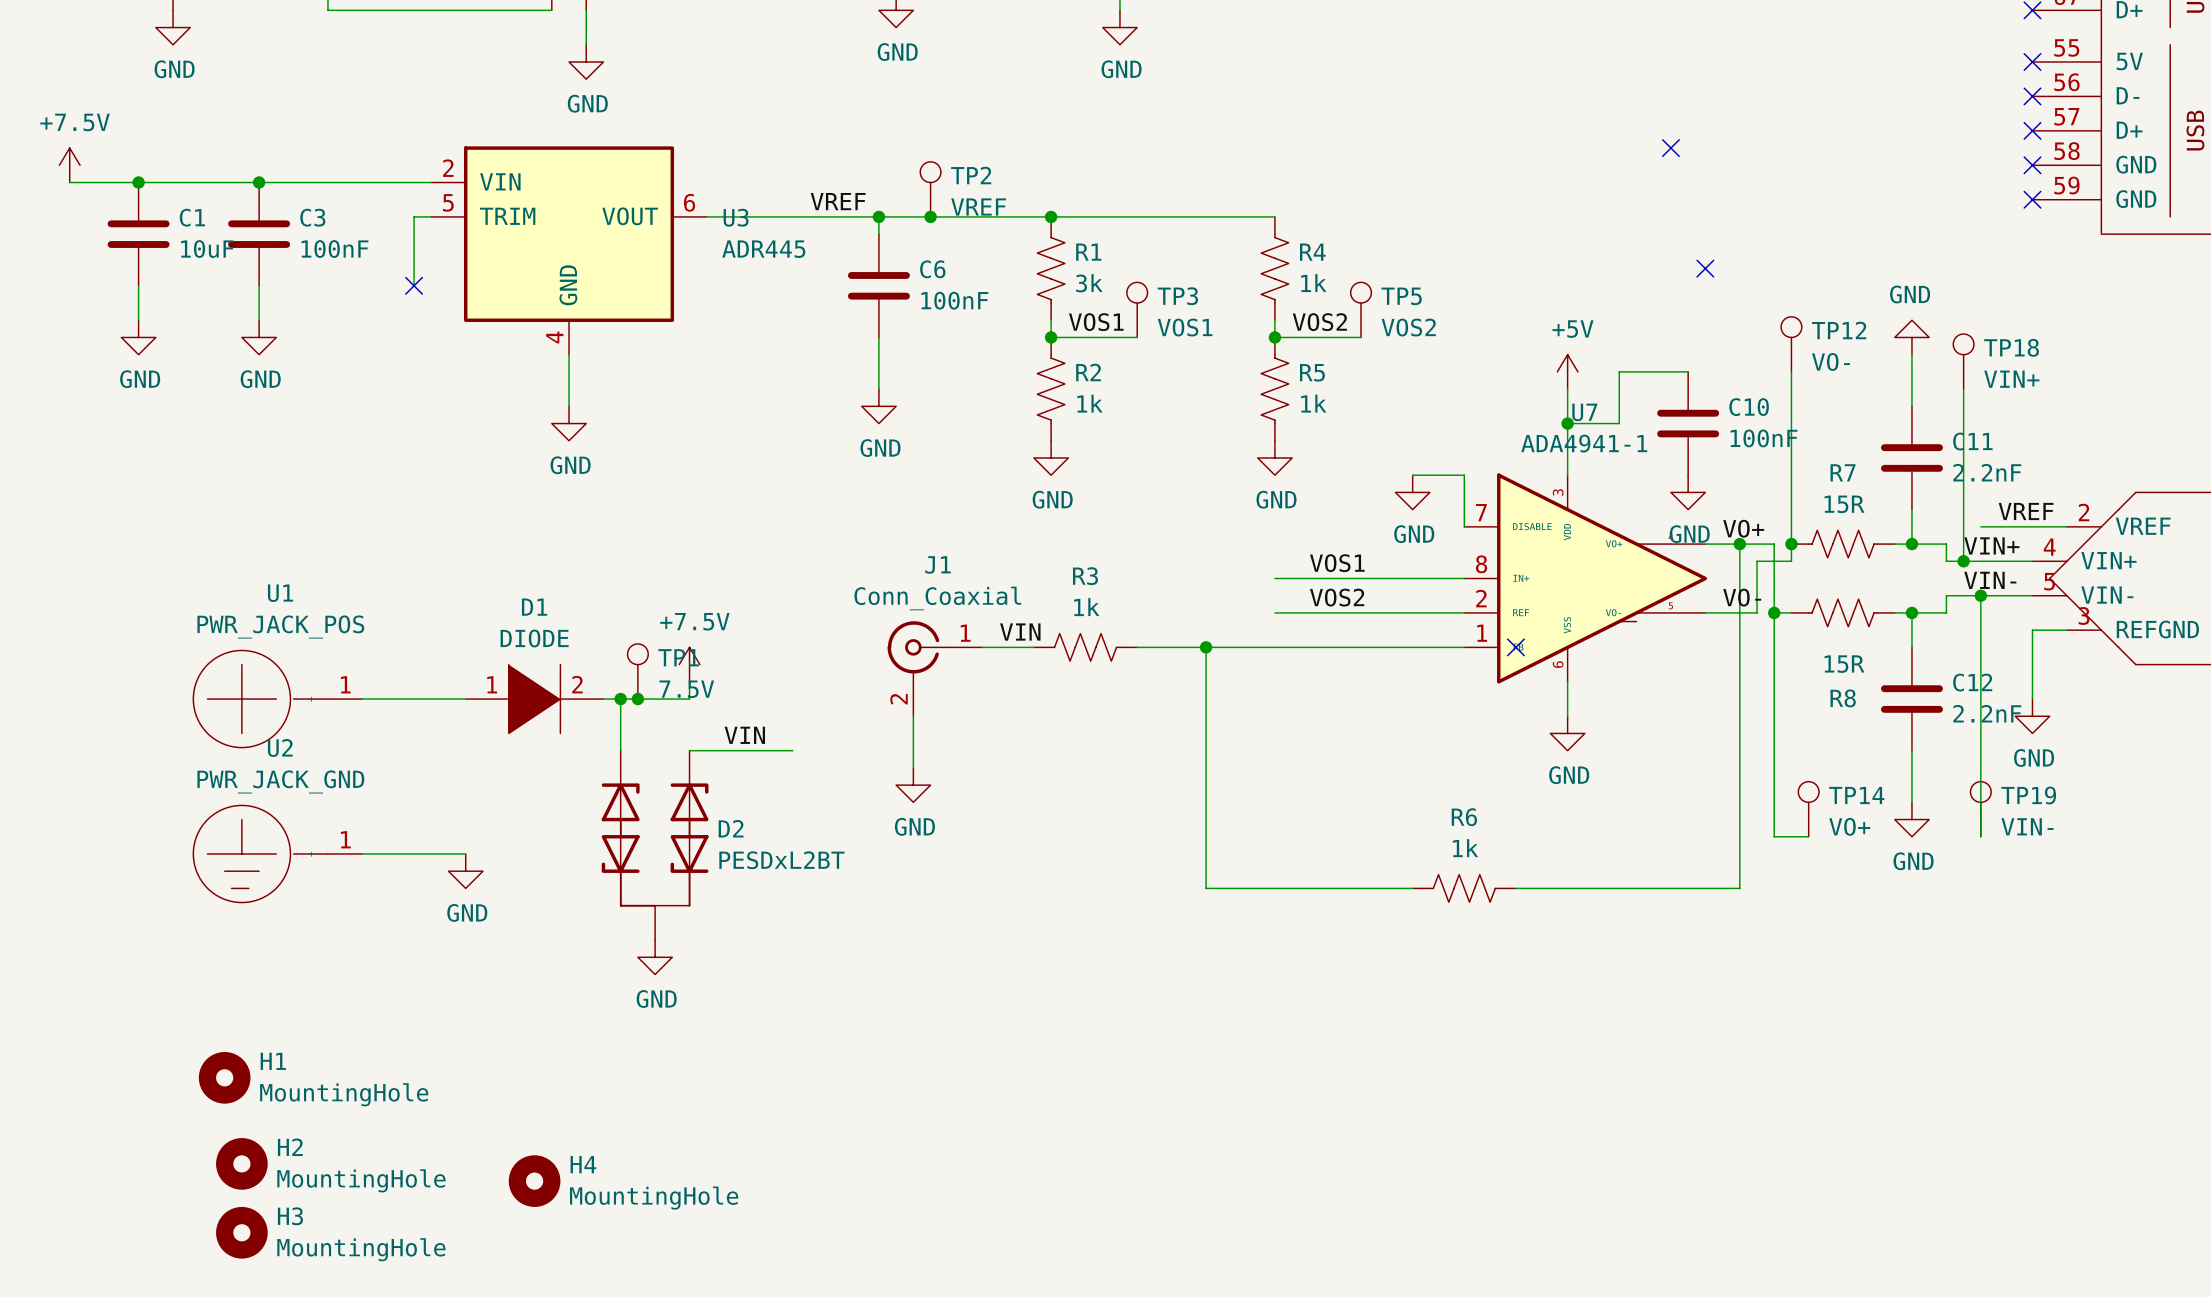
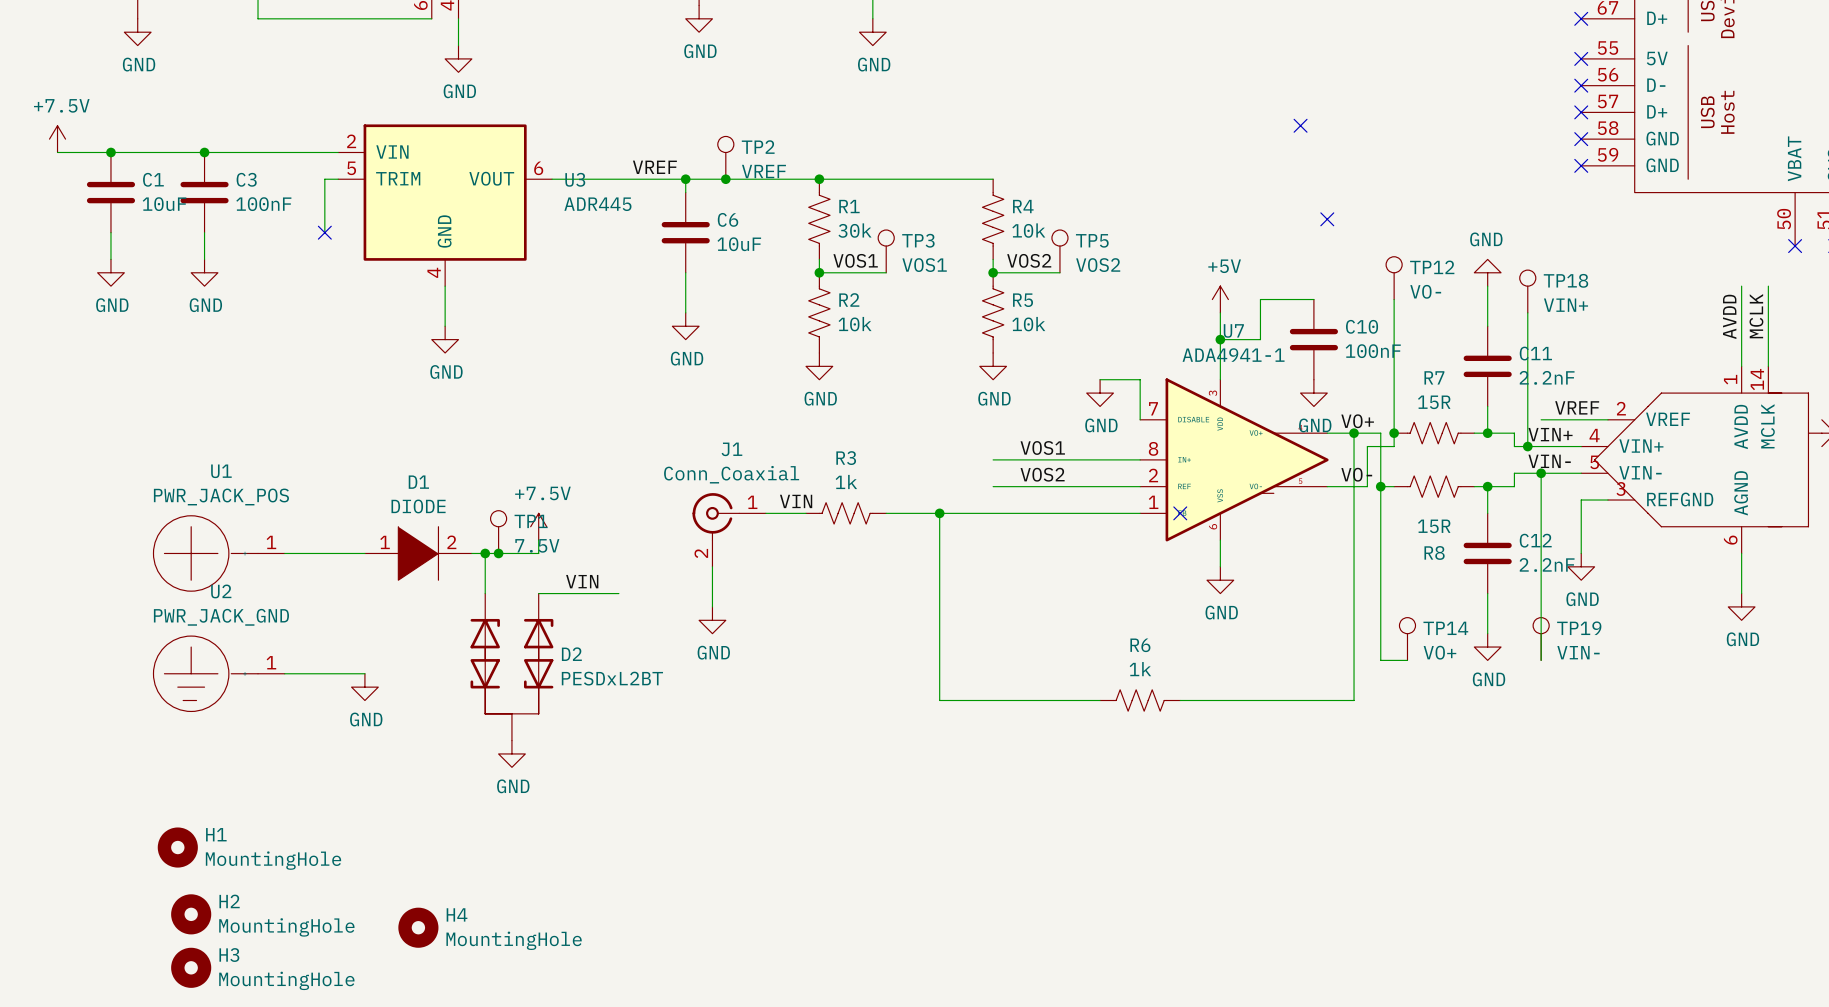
R1 value: 3k (1089, 283) -> 30k (855, 230)
R4 value: 1k (1313, 283) -> 10k (1028, 230)
C6 value: 100nF (954, 300) -> 10uF (739, 244)
R2 value: 1k (1089, 403) -> 10k (855, 324)
R5 value: 1k (1313, 403) -> 10k (1028, 324)

